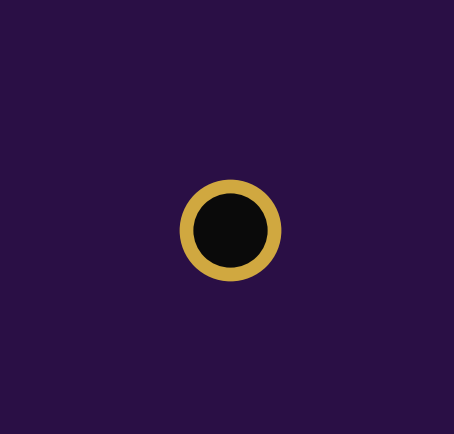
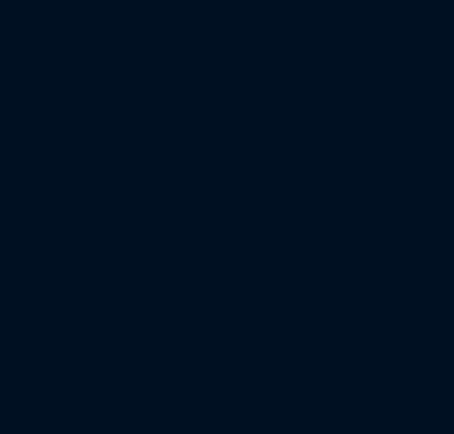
via: (230, 230) -> none

